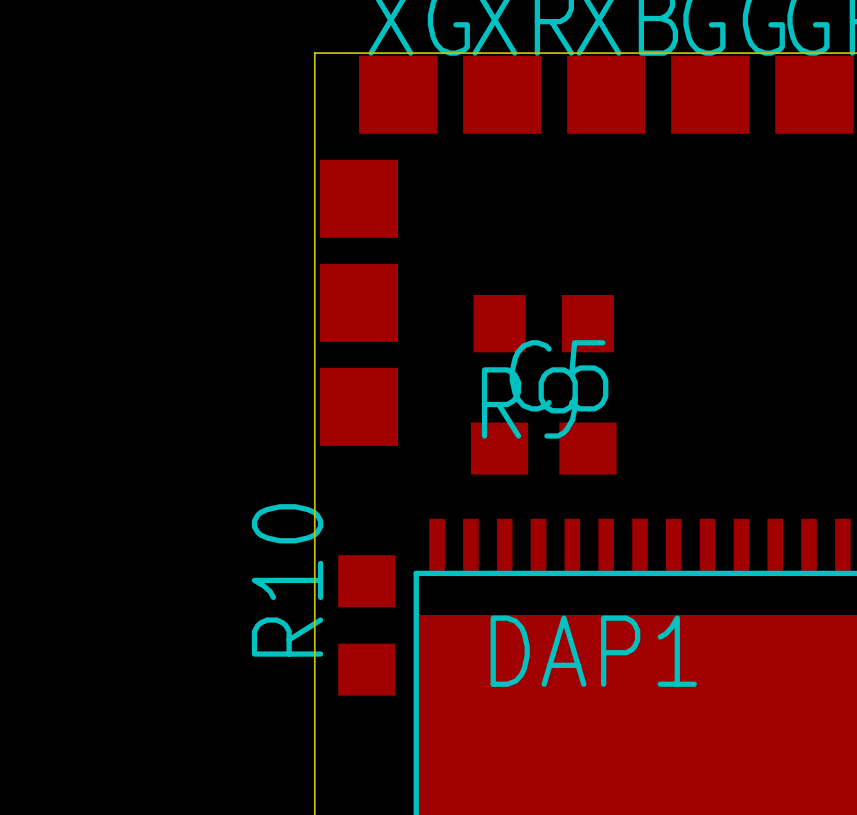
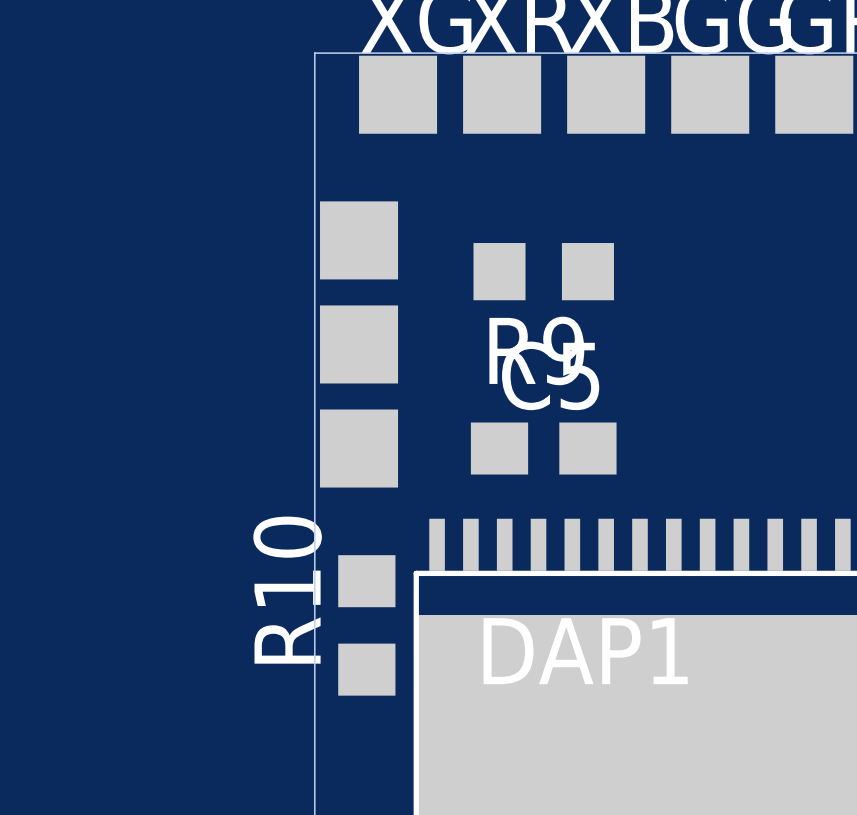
part position: (359, 302) -> (359, 344)
R9 position: (543, 323) -> (543, 271)

